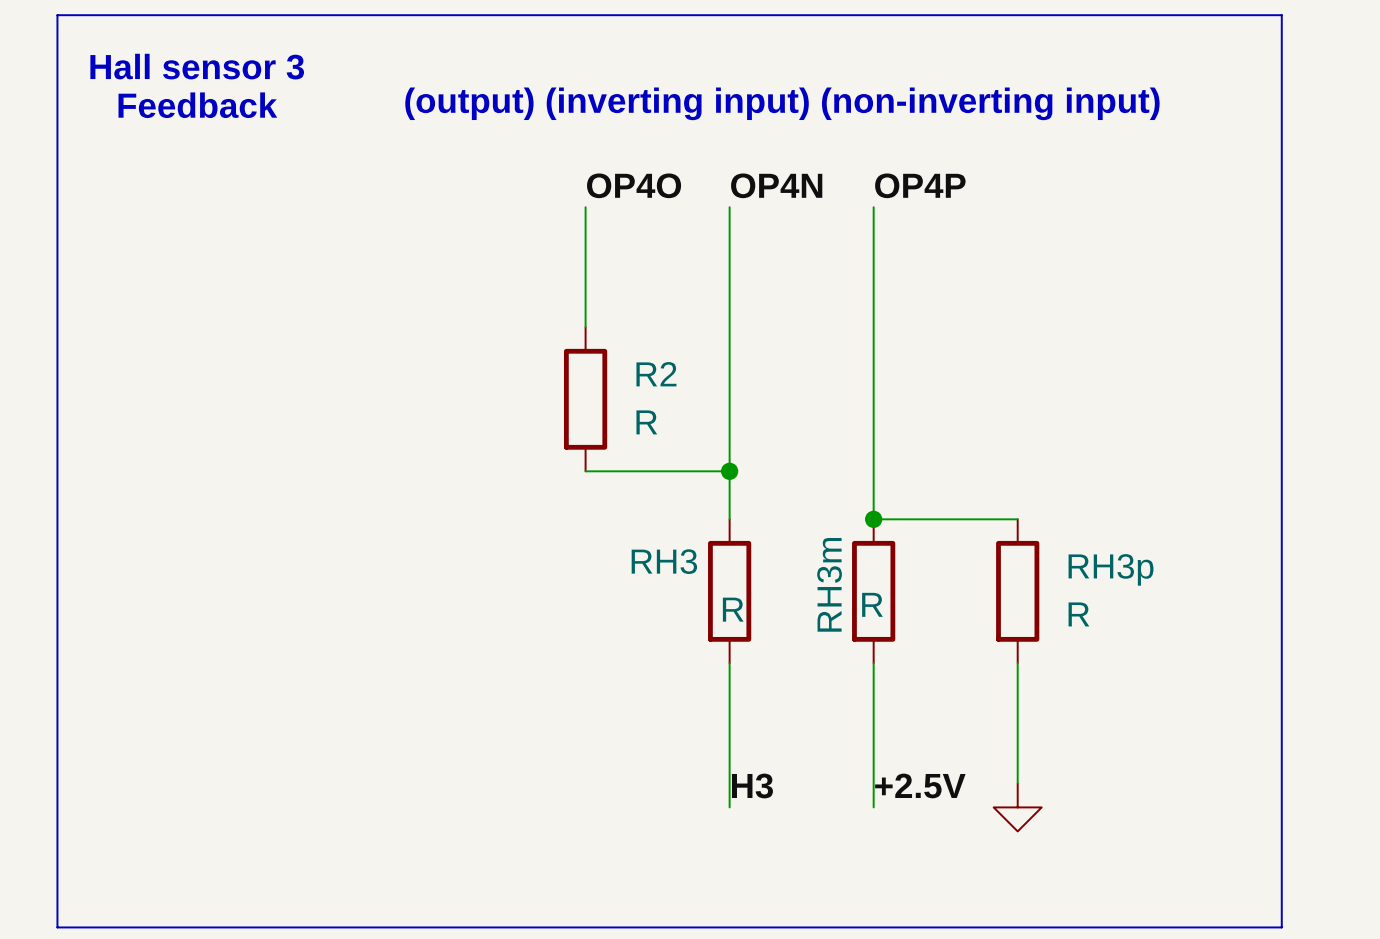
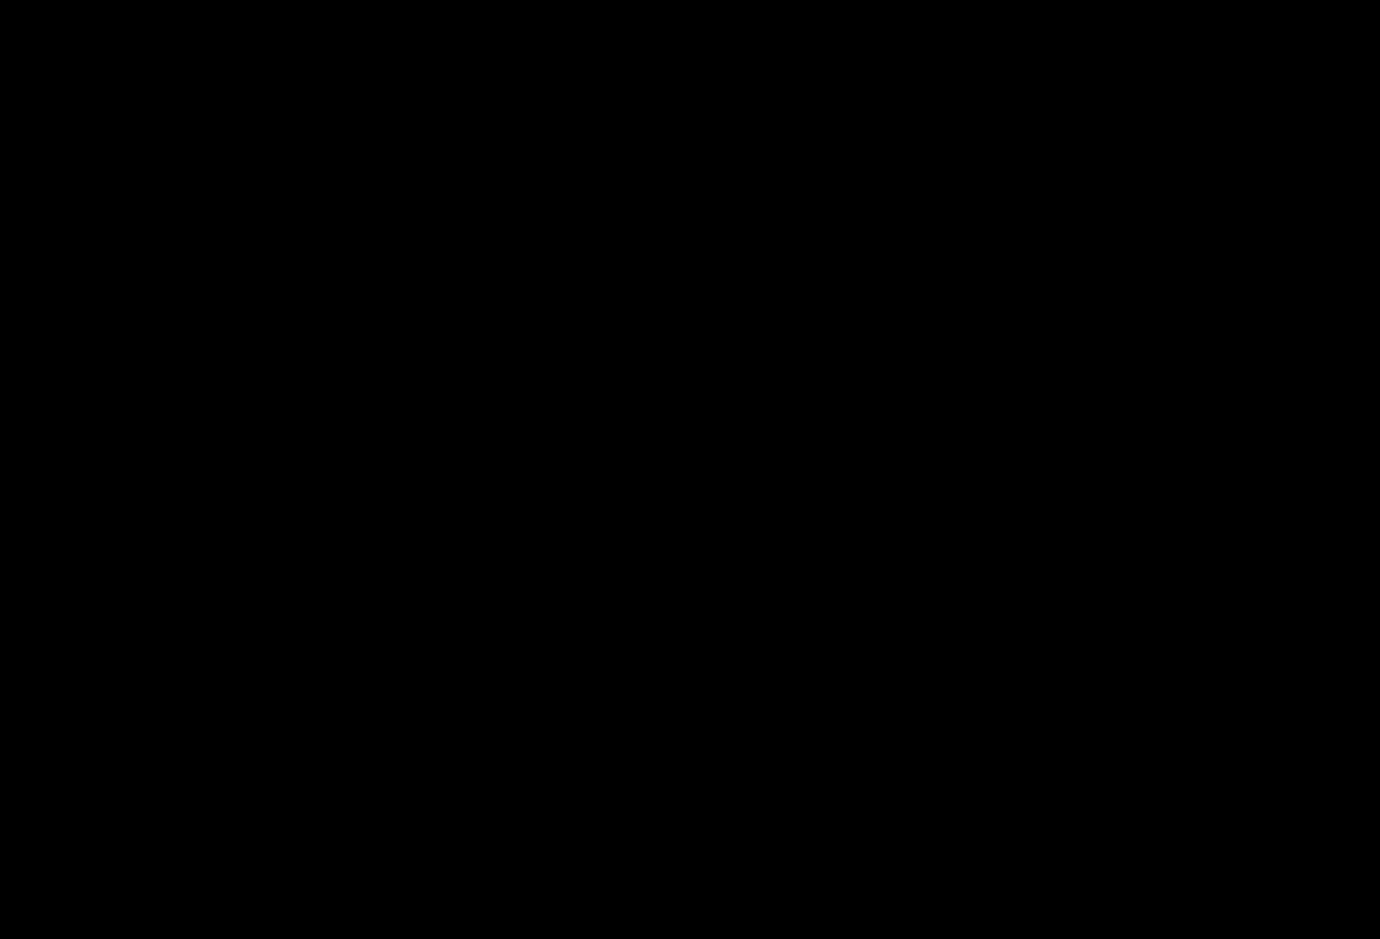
line: (57, 15) (57, 927) (1281, 927) (1281, 15) (57, 15) -> none
text: Hall sensor 3 (197, 66) -> none
text: (output) (inverting input) (non-inverting input) (782, 103) -> none
text: Feedback (197, 105) -> none
label: OP4O (634, 185) -> none
label: OP4N (776, 185) -> none
label: OP4P (920, 185) -> none
wire: (585, 207) (585, 327) -> none
wire: (729, 207) (729, 519) -> none
wire: (873, 207) (873, 519) (1017, 519) -> none
R2: R (585, 399) -> none
wire: (585, 471) (729, 471) -> none
junction: (729, 471) -> none
junction: (873, 519) -> none
RH3: R (729, 591) -> none
RH3m: R (873, 591) -> none
RH3p: R (1017, 591) -> none
wire: (729, 663) (729, 807) -> none
wire: (873, 663) (873, 807) -> none
wire: (1017, 663) (1017, 783) -> none
label: +2.5V (920, 785) -> none
label: H3 (752, 786) -> none
power symbol: (1017, 807) -> none

